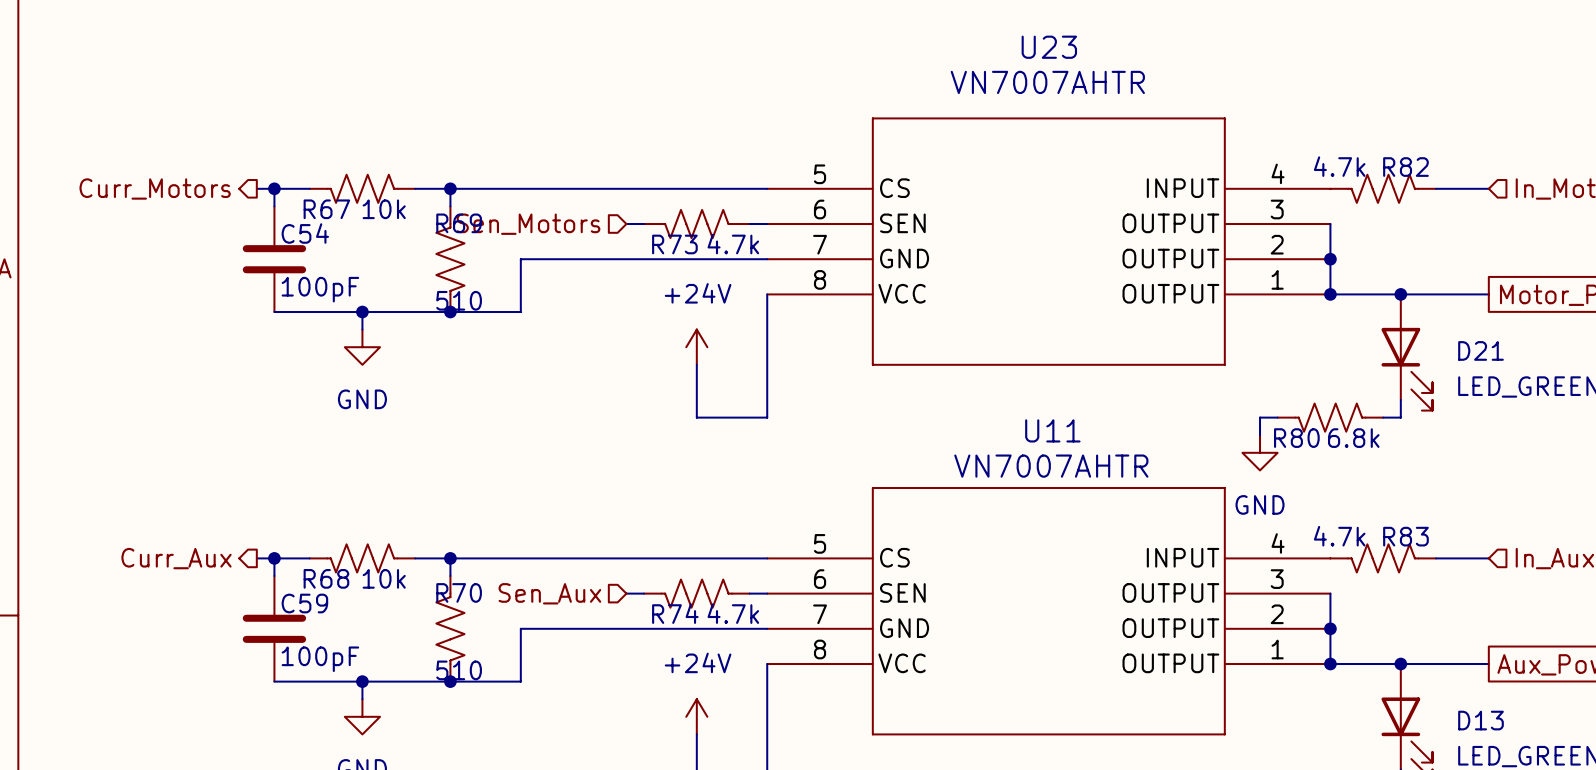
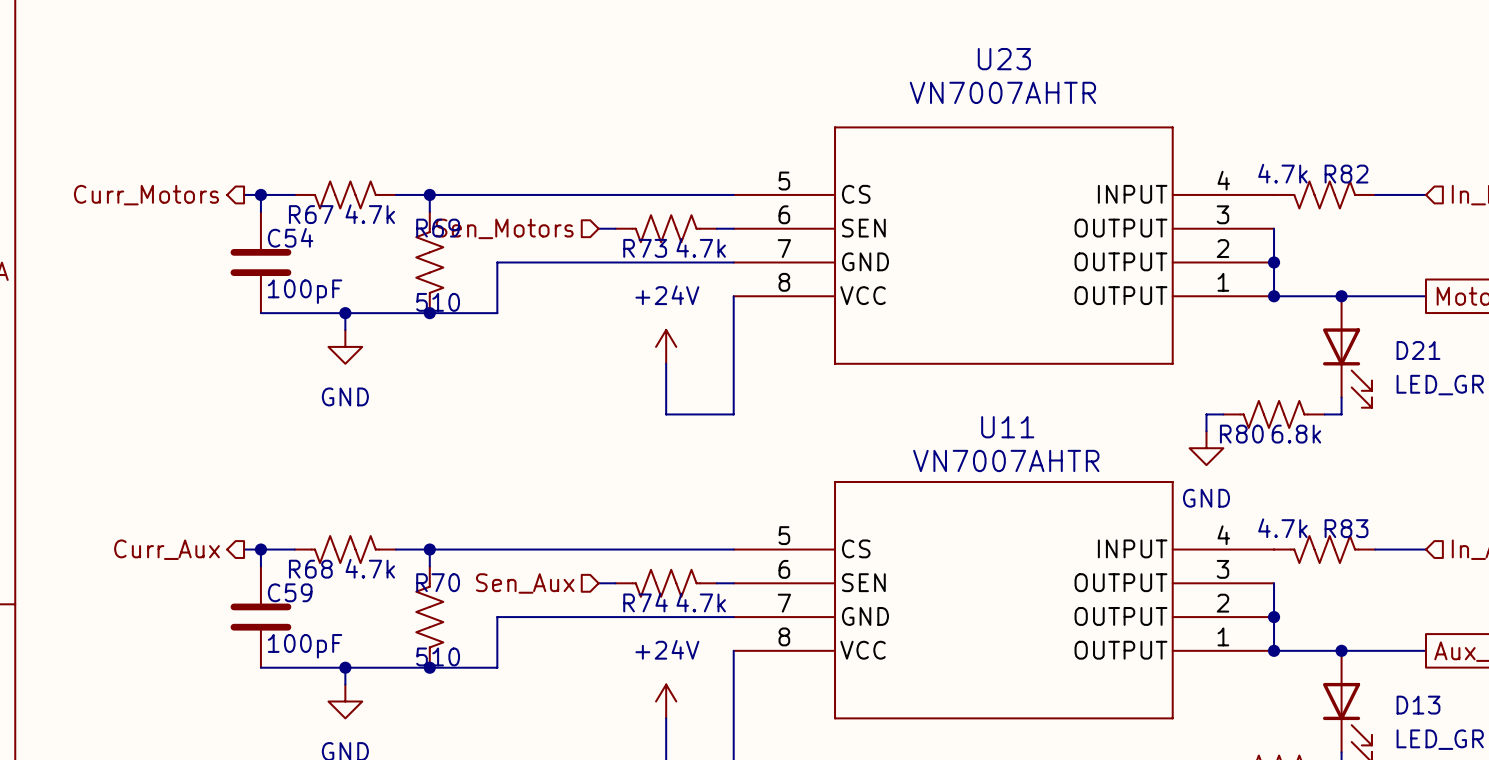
R67 value: 10k (384, 209) -> 4.7k (370, 214)
R68 value: 10k (384, 578) -> 4.7k (370, 568)

